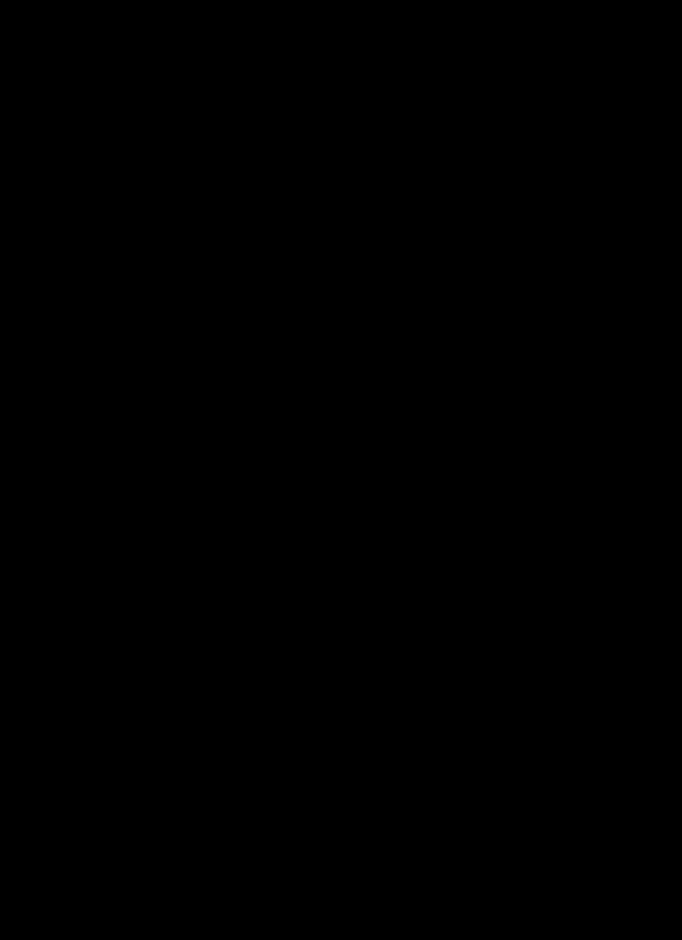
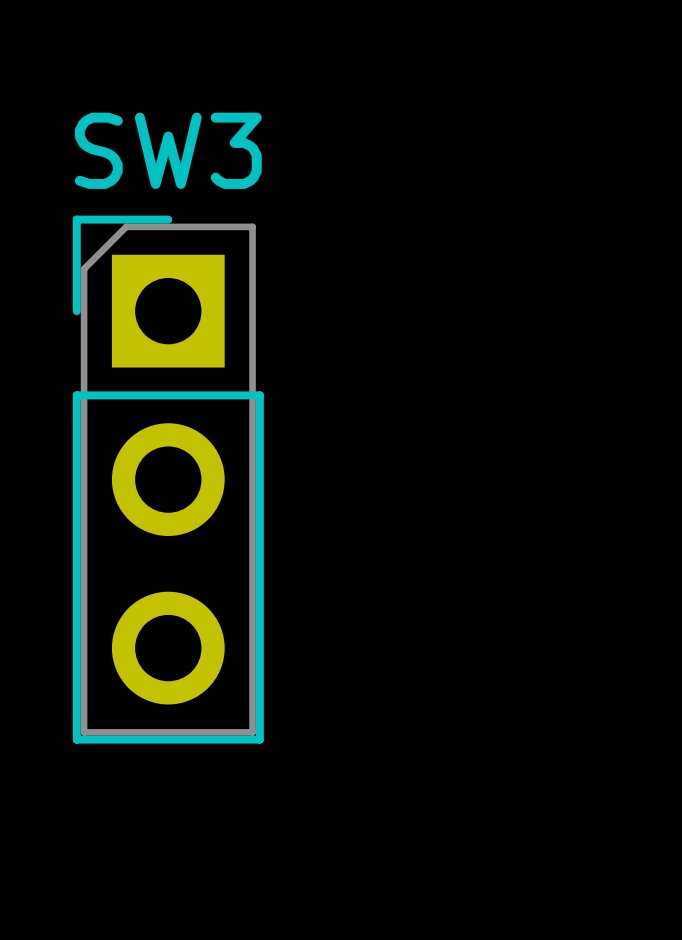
SW3: none -> (168, 479)

